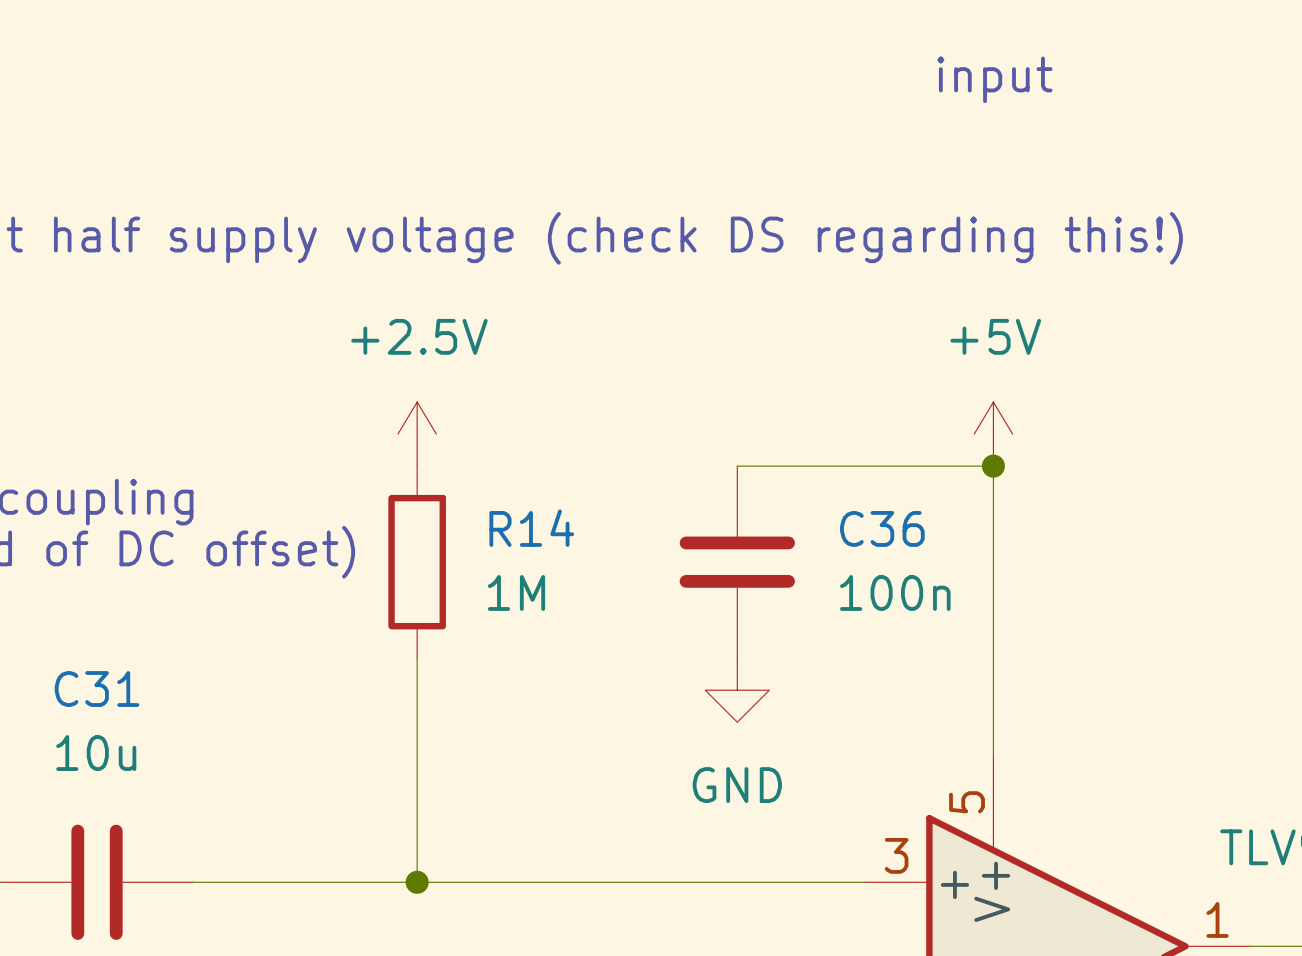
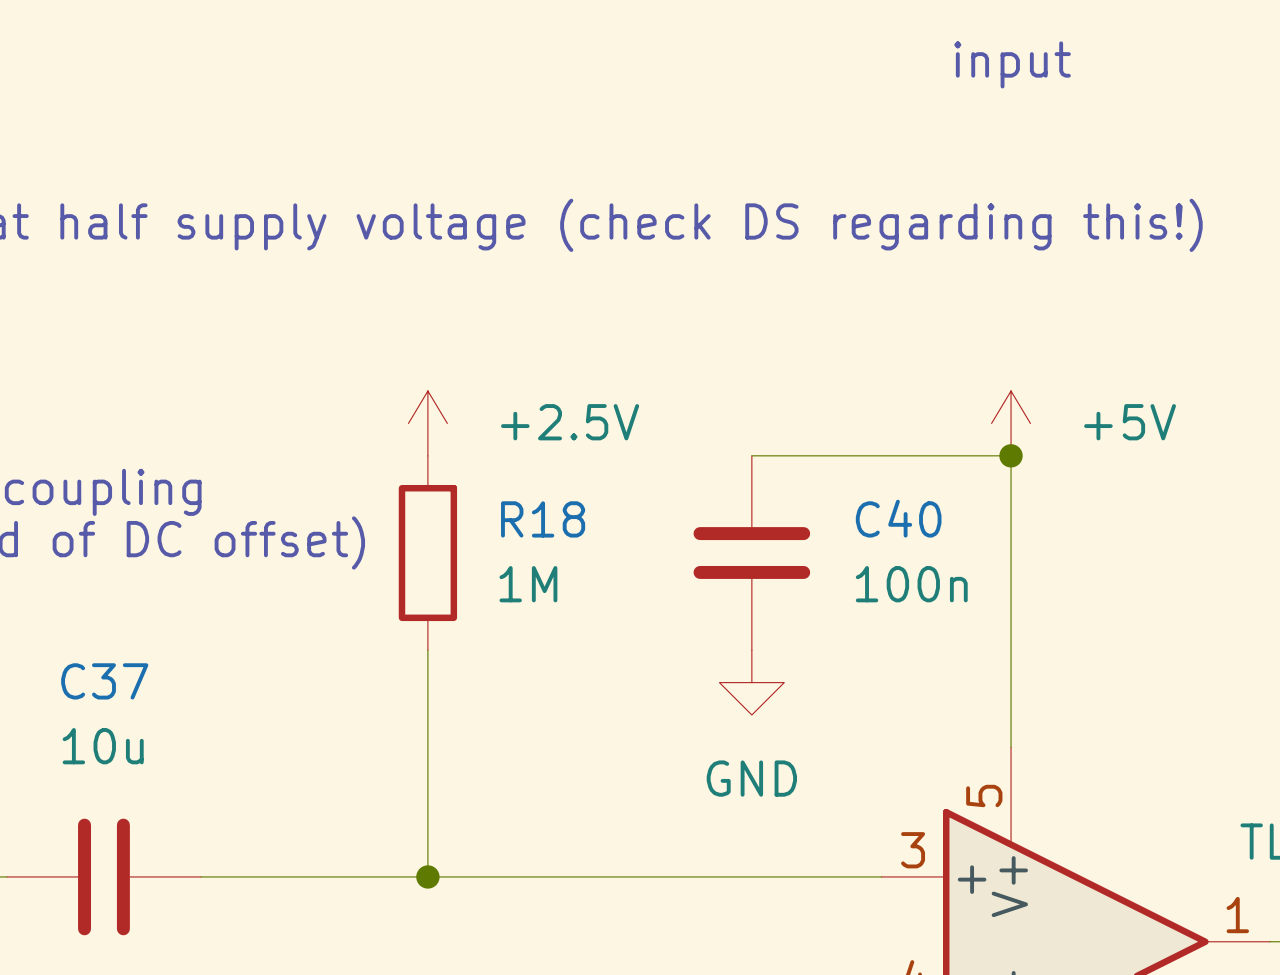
power symbol text position: +2.5V (419, 336) -> +2.5V (570, 422)
power symbol text position: +5V (995, 336) -> +5V (1130, 422)
R14 name: R14 (531, 528) -> R18 (543, 519)
C36 name: C36 (882, 528) -> C40 (898, 518)
C31 name: C31 (97, 689) -> C37 (104, 681)

